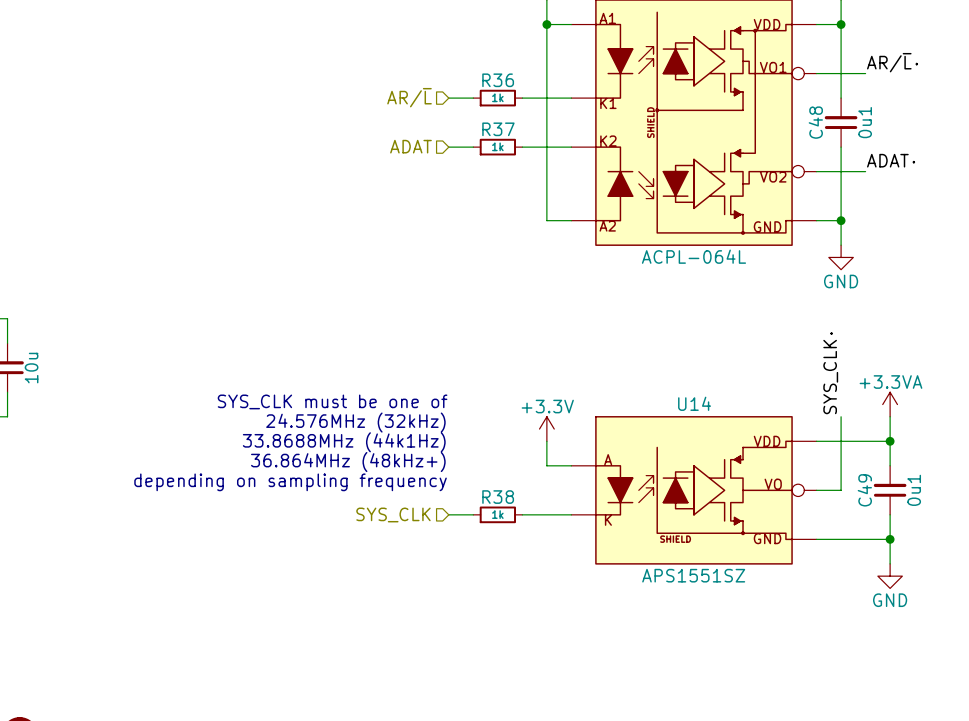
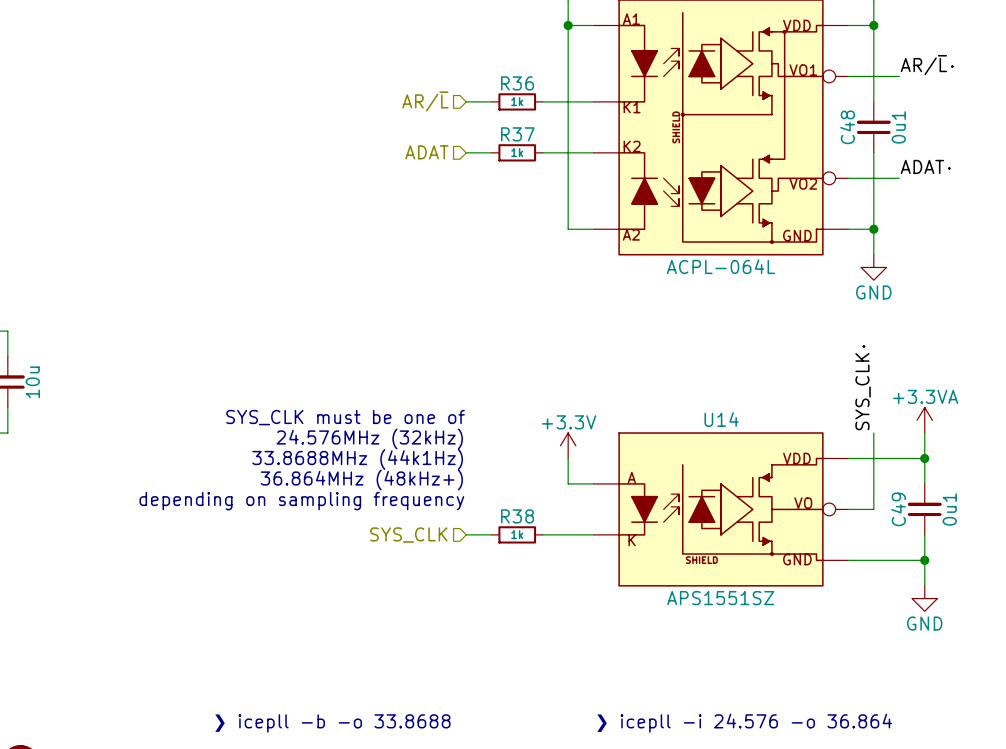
text: none -> ❯ icepll -b -o 33.8688 (332, 723)
text: none -> ❯ icepll -i 24.576 -o 36.864 (744, 723)

